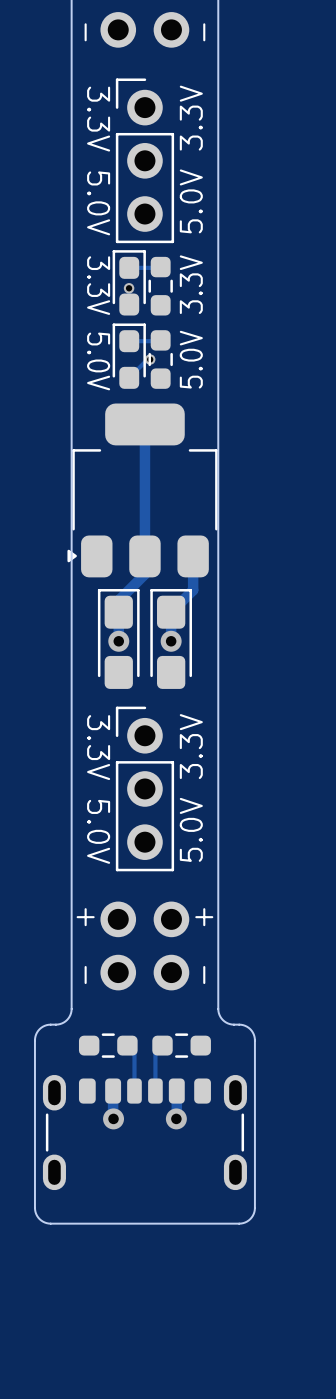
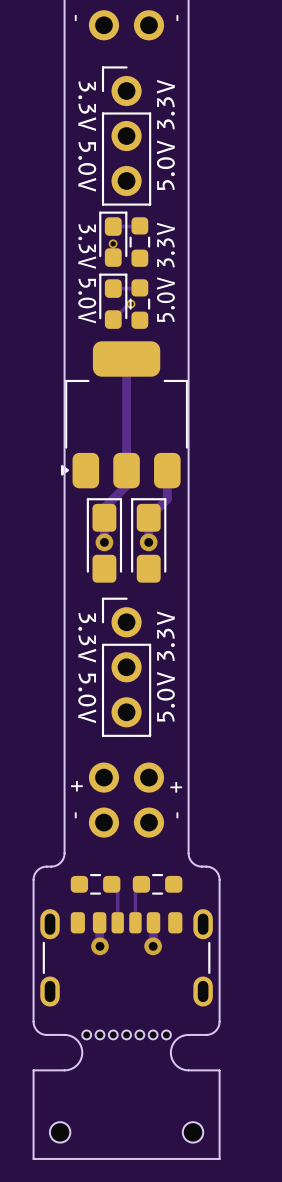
board edge: (71, 1223) (218, 1223) -> none
part: none -> (126, 1050)
board edge: none -> (64, 1070) (33, 1070) (33, 1158) (219, 1158) (219, 1070) (188, 1070)
part: none -> (60, 1132)
part: none -> (193, 1132)

